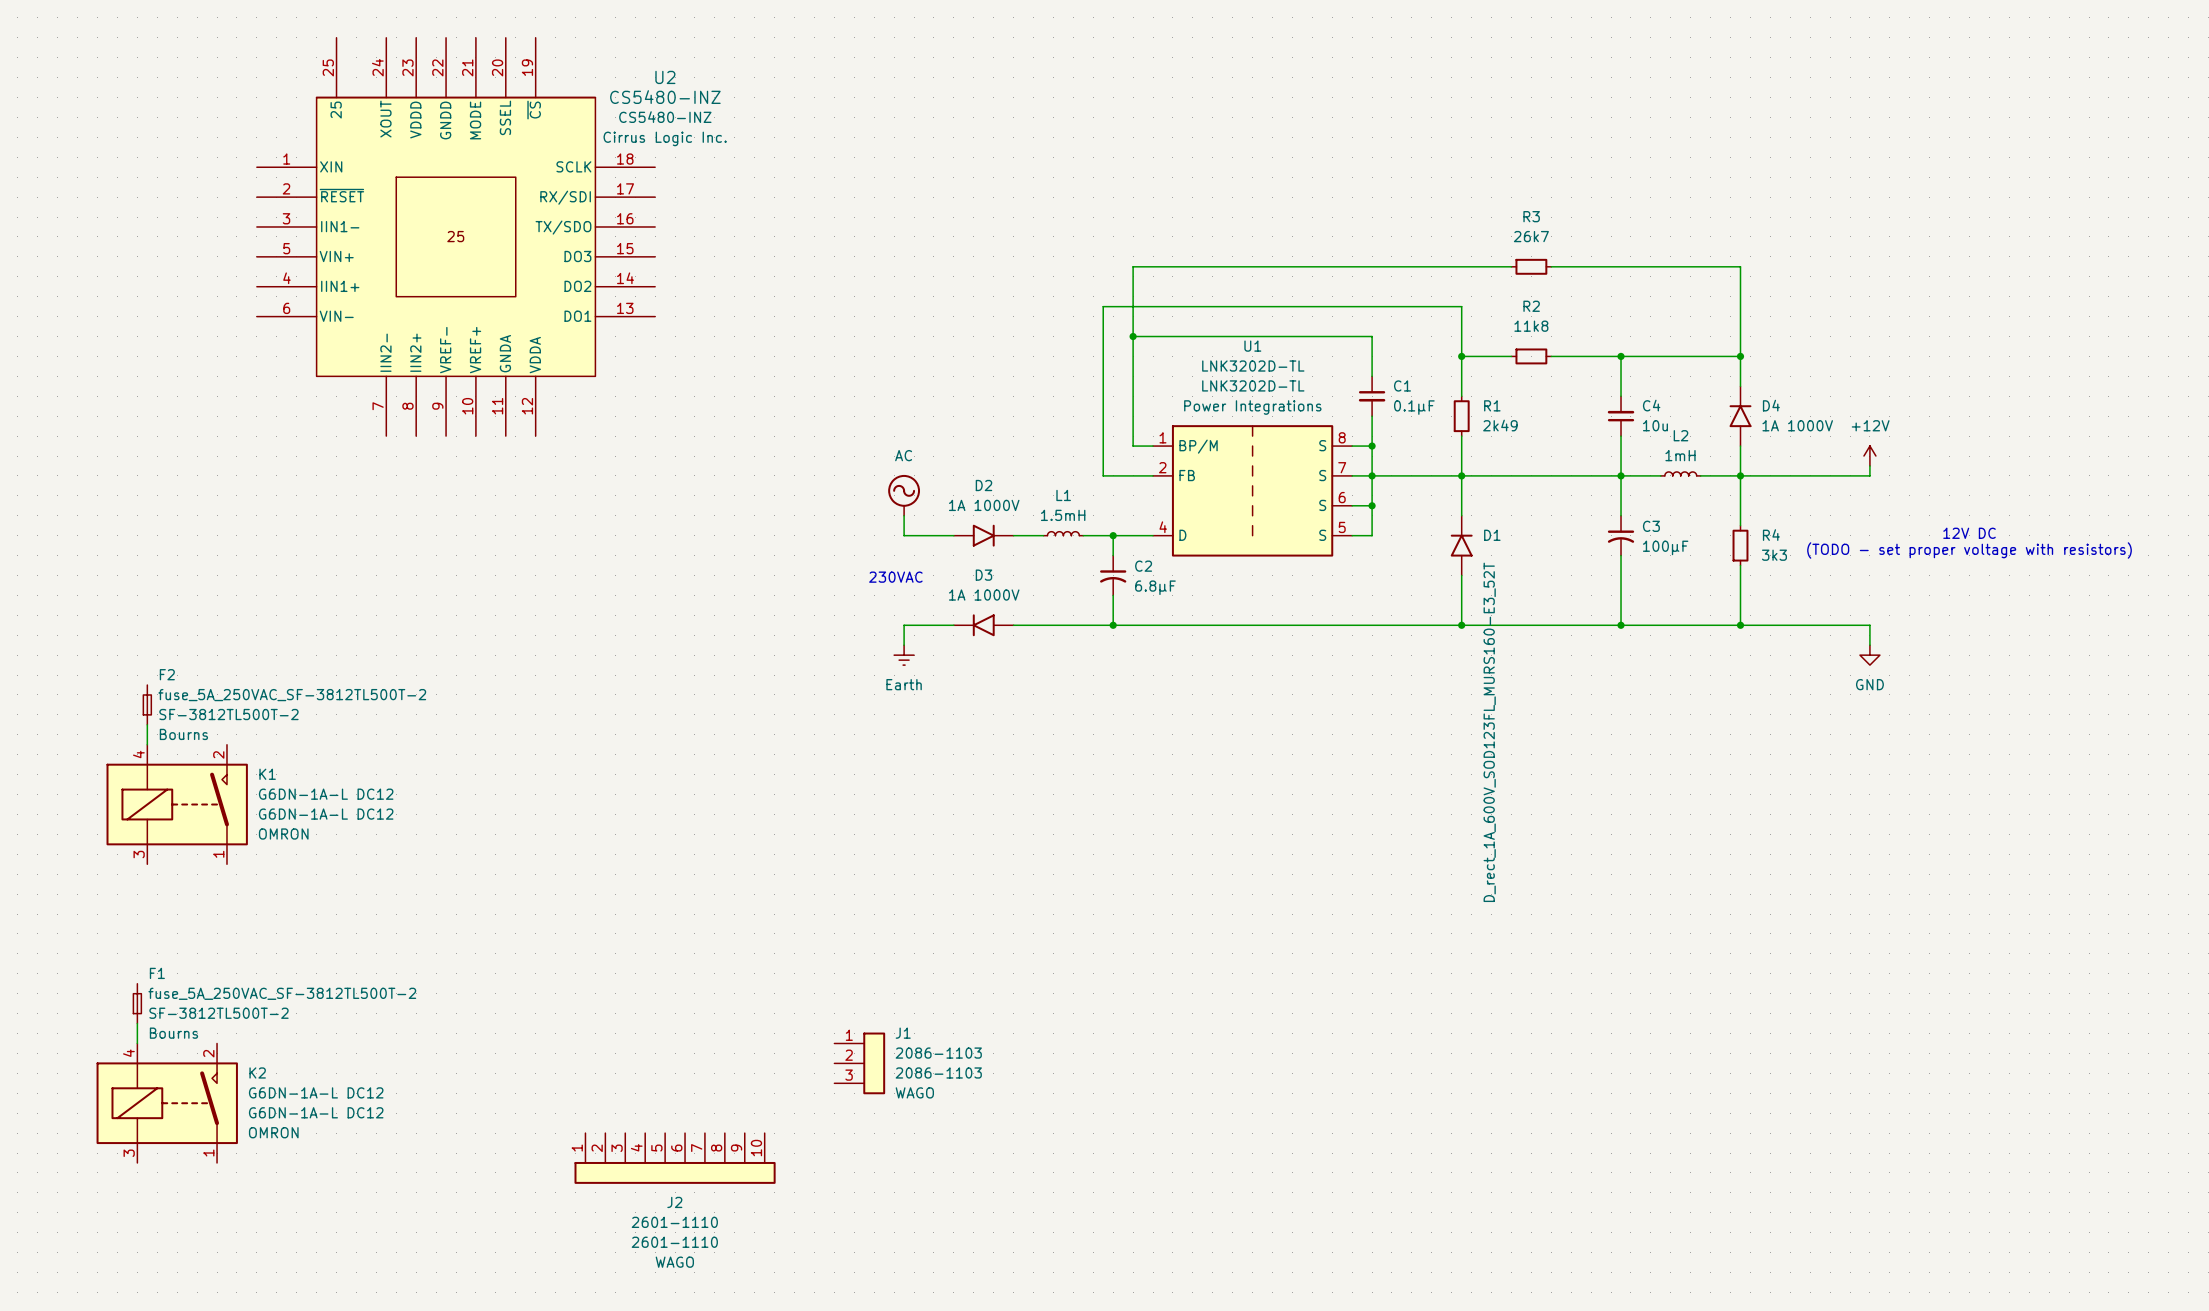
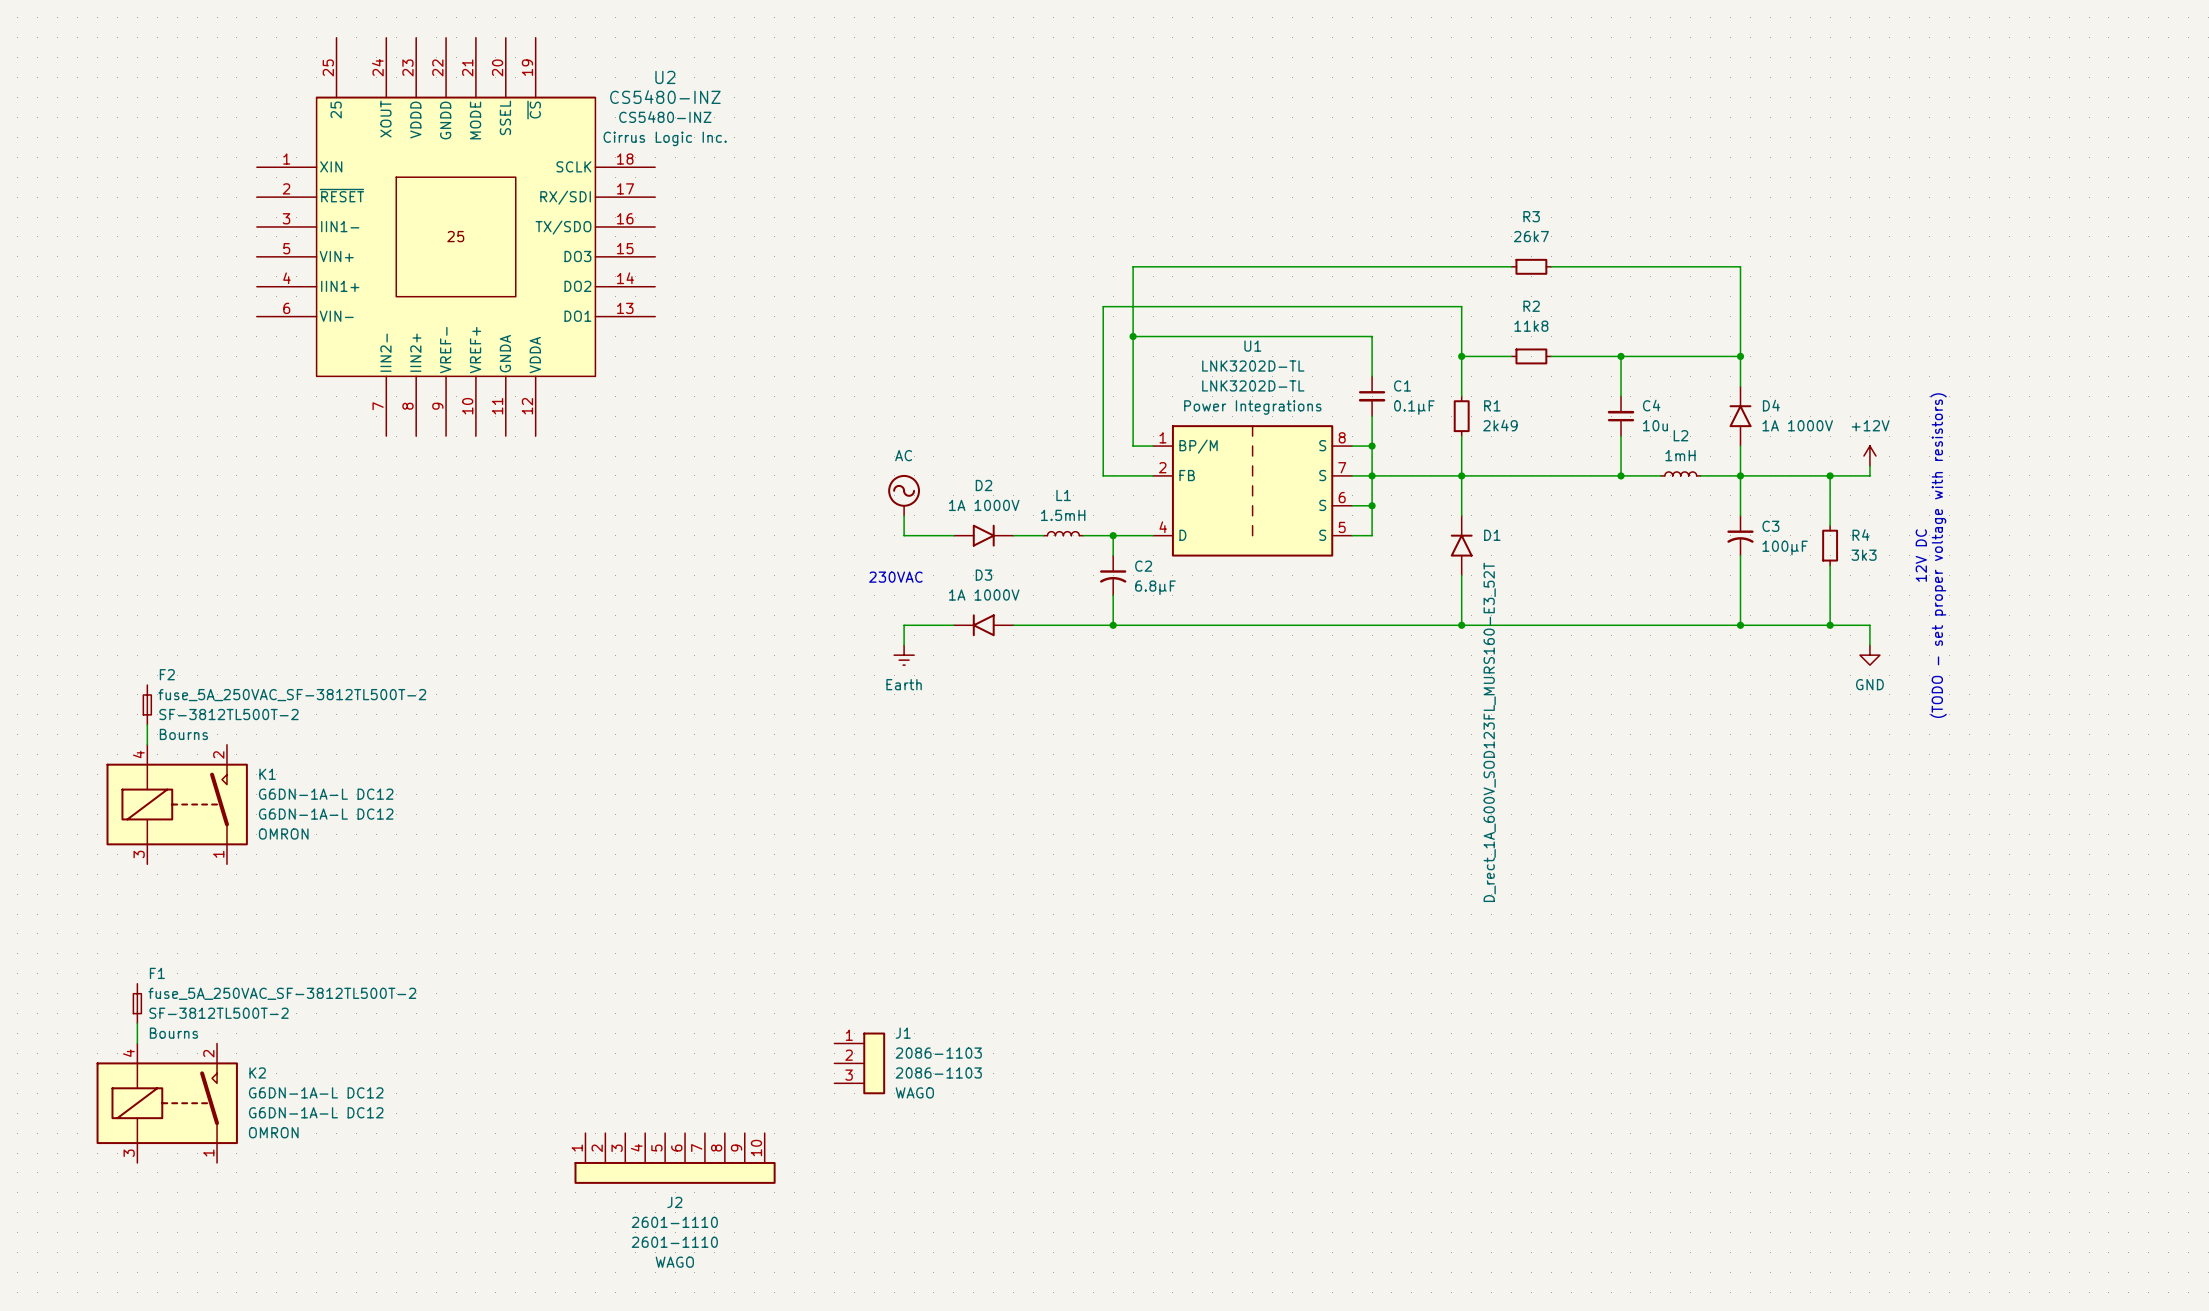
wire: (1621, 475) (1621, 515) -> none
wire: none -> (1830, 475) (1830, 525)
junction: none -> (1830, 475)
text rotation: 0° (1969, 533) -> 90° counterclockwise (1921, 555)
C3 position: (1621, 535) -> (1740, 535)
R4 position: (1740, 545) -> (1830, 545)
text rotation: 0° (1969, 550) -> 90° counterclockwise (1938, 555)
wire: (1621, 555) (1621, 625) -> none
wire: none -> (1830, 565) (1830, 625)
junction: (1621, 625) -> none
junction: none -> (1830, 625)

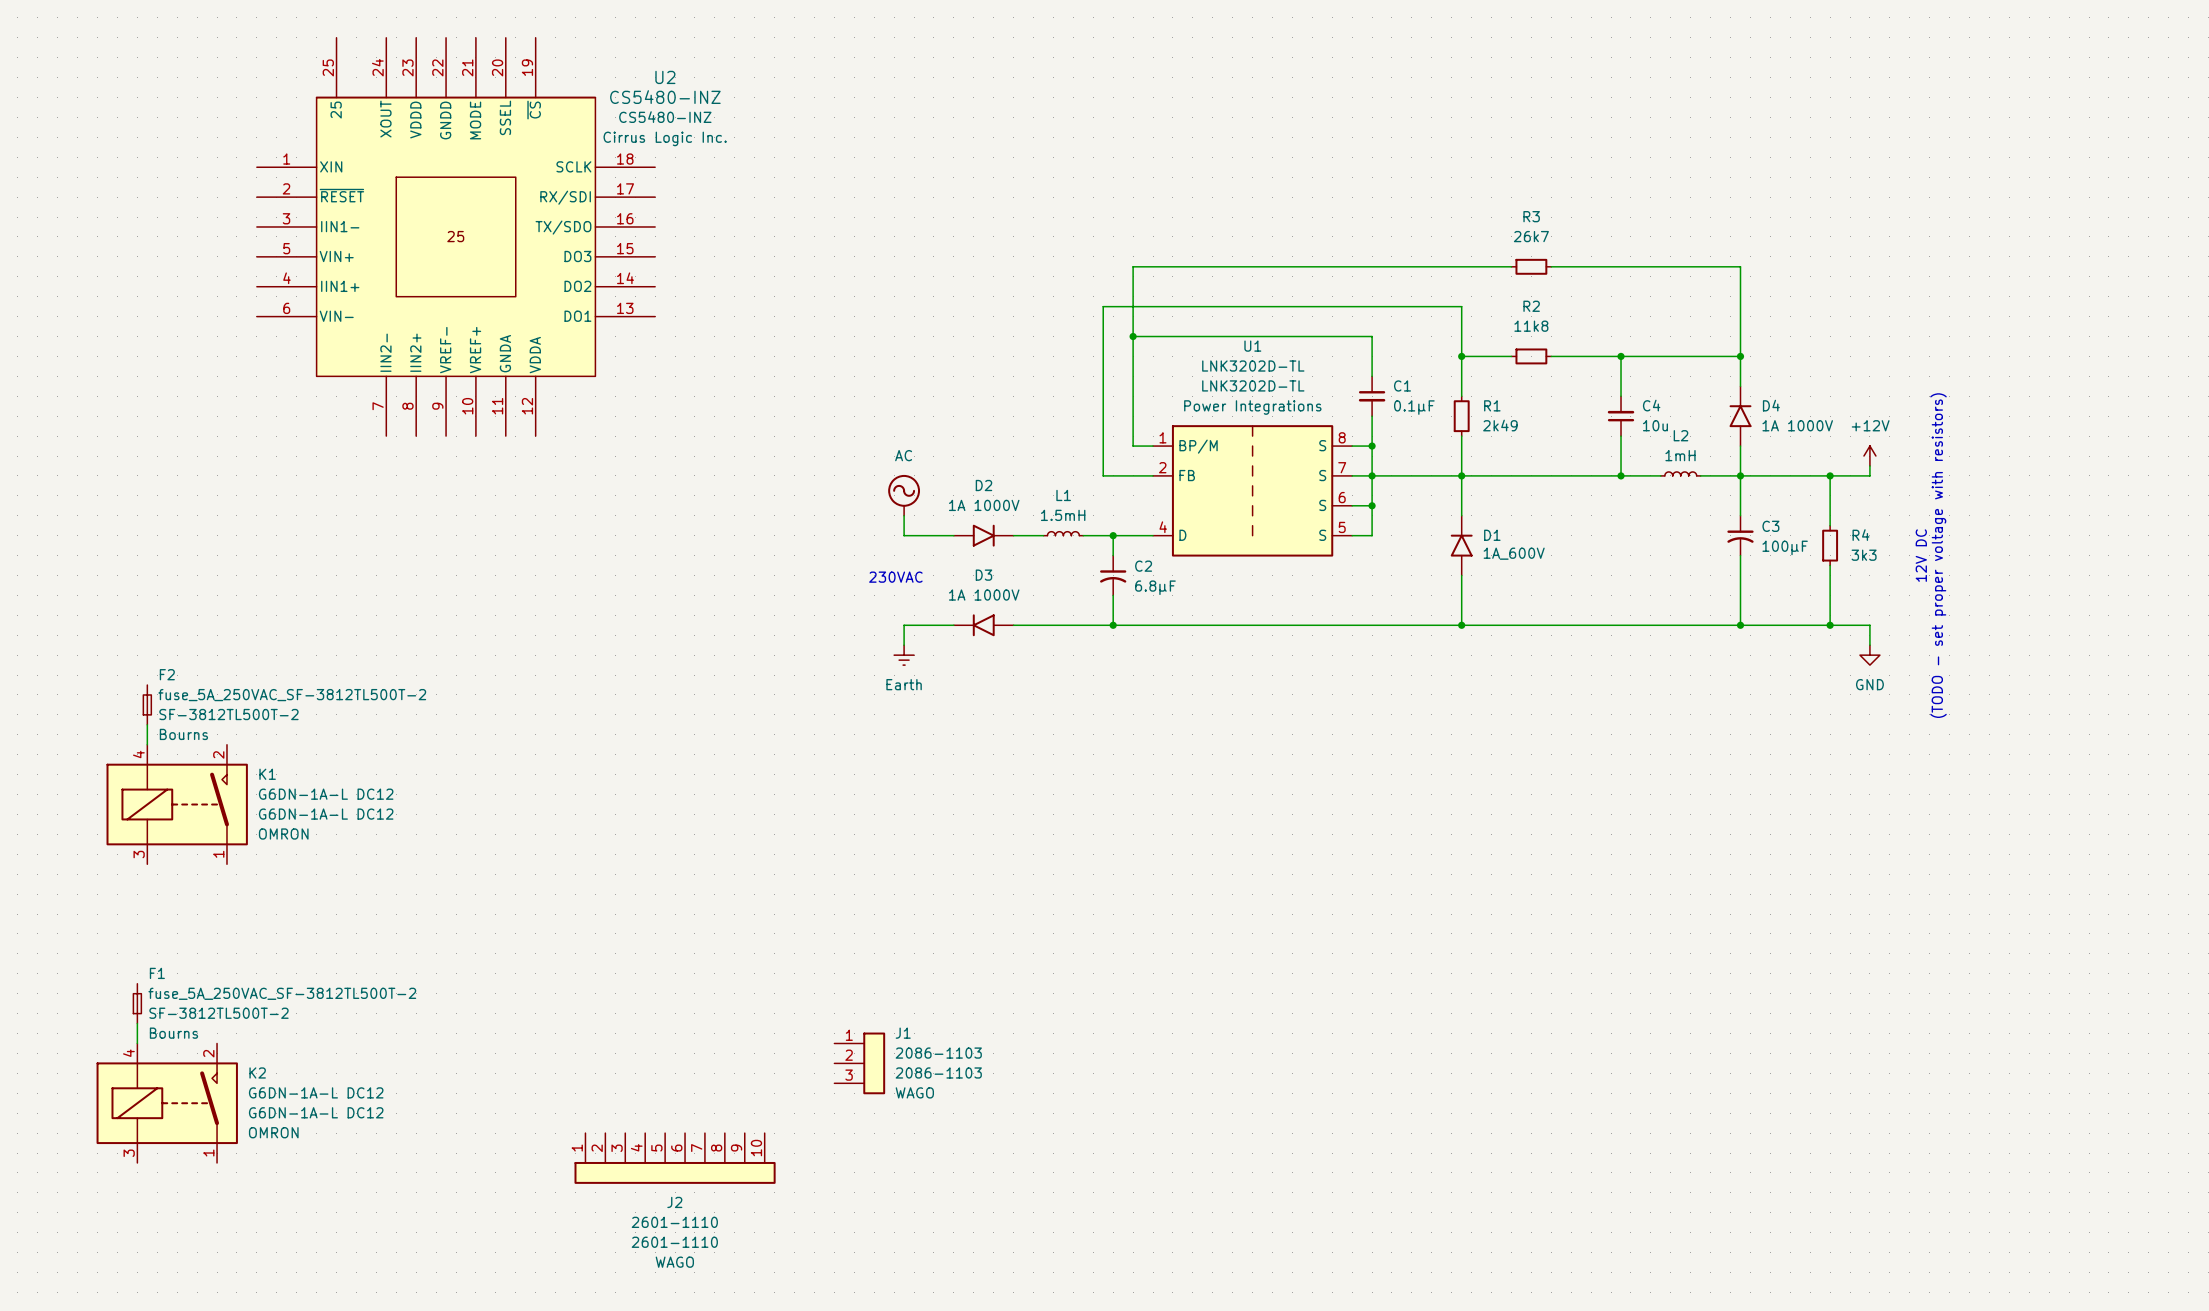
D1 text: D_rect_1A_600V_SOD123FL_MURS160-E3_52T (1489, 732) -> 1A_600V (1514, 553)

